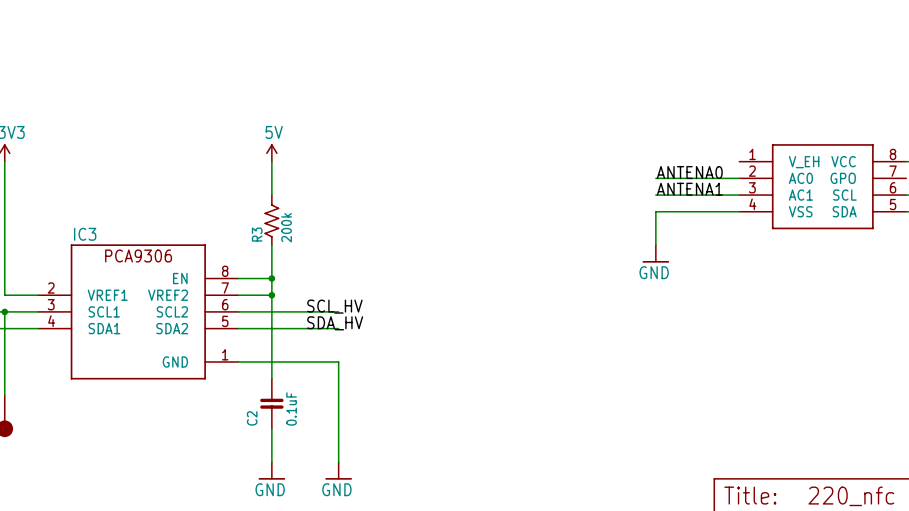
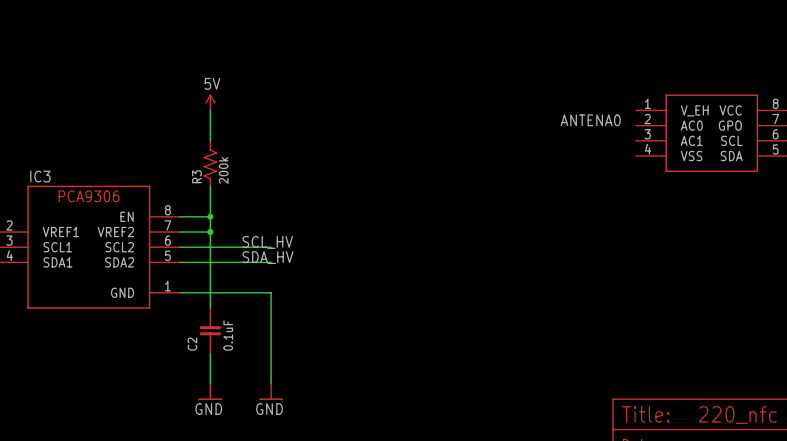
wire: (655, 178) (739, 178) -> none
label: ANTENA1 (689, 189) -> none
wire: (655, 195) (739, 195) -> none
wire: (739, 211) (655, 211) (655, 245) -> none
power symbol: GND (655, 253) -> none

